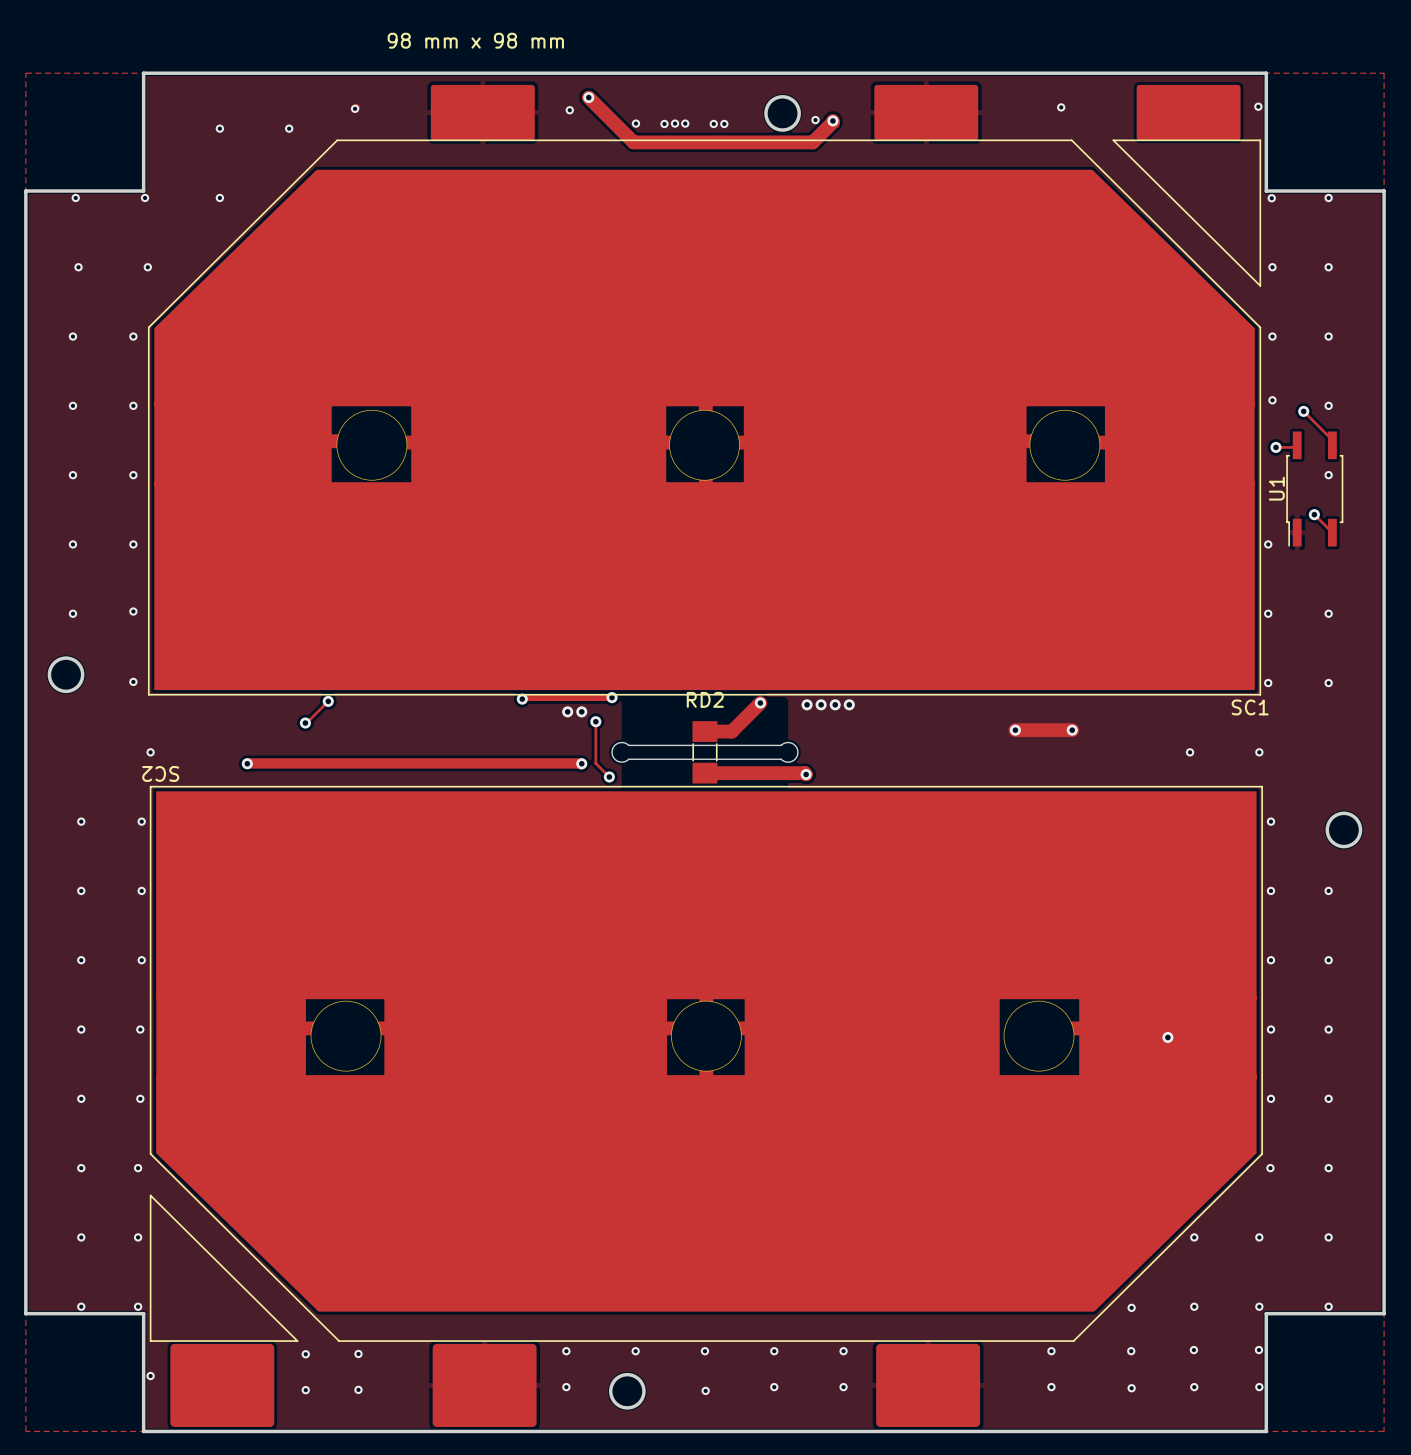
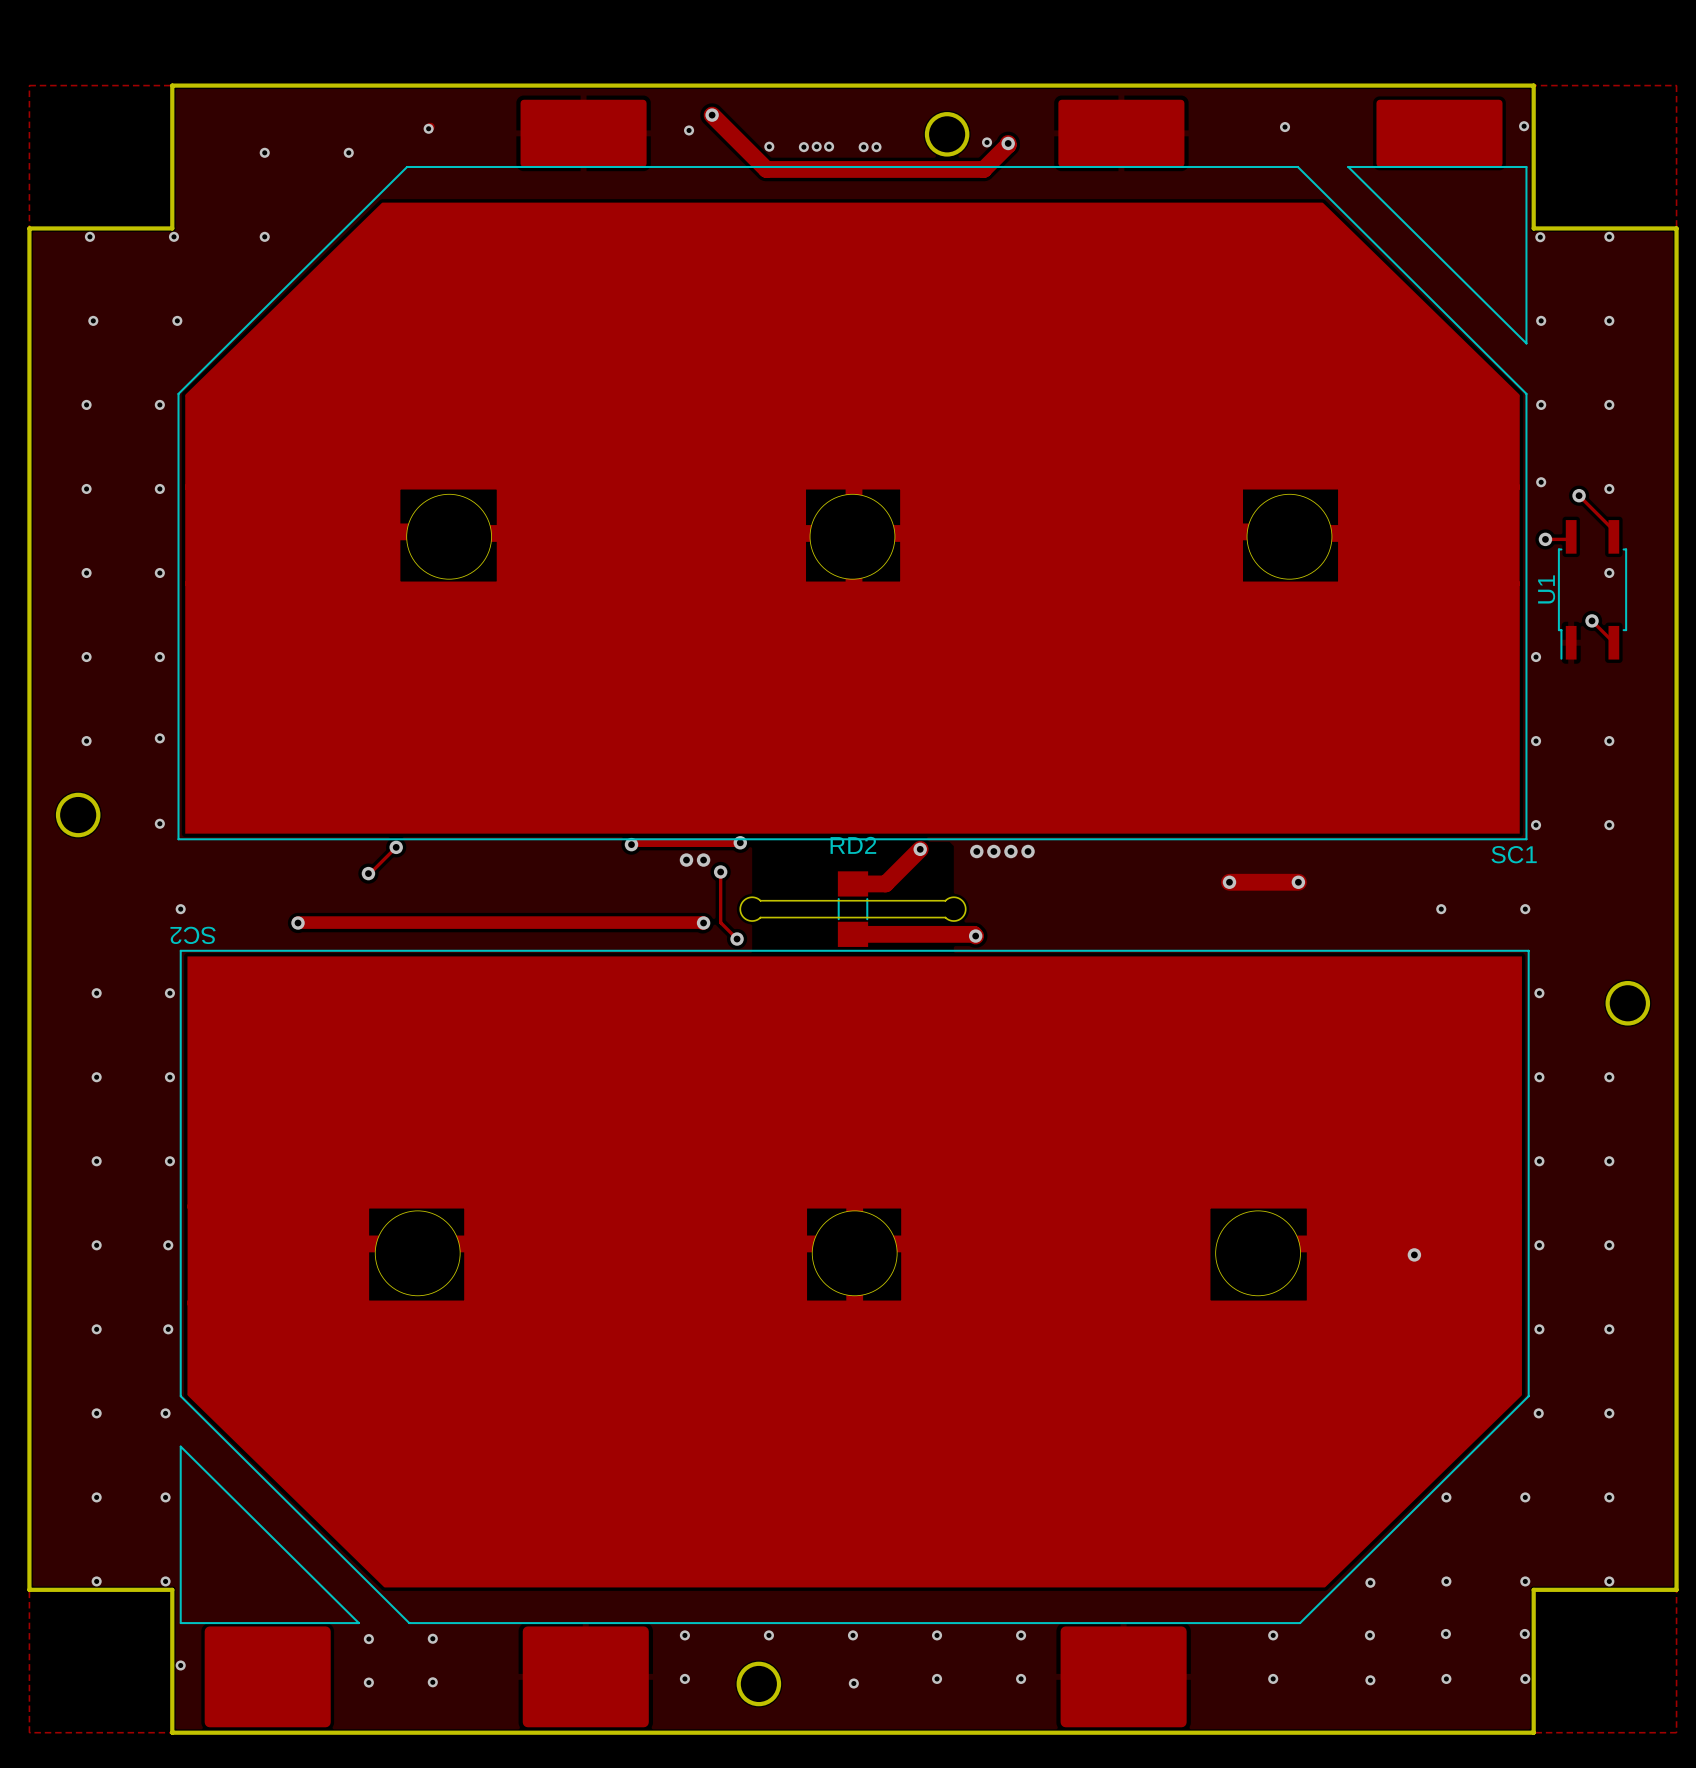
text: 98 mm x 98 mm (475, 40) -> none

